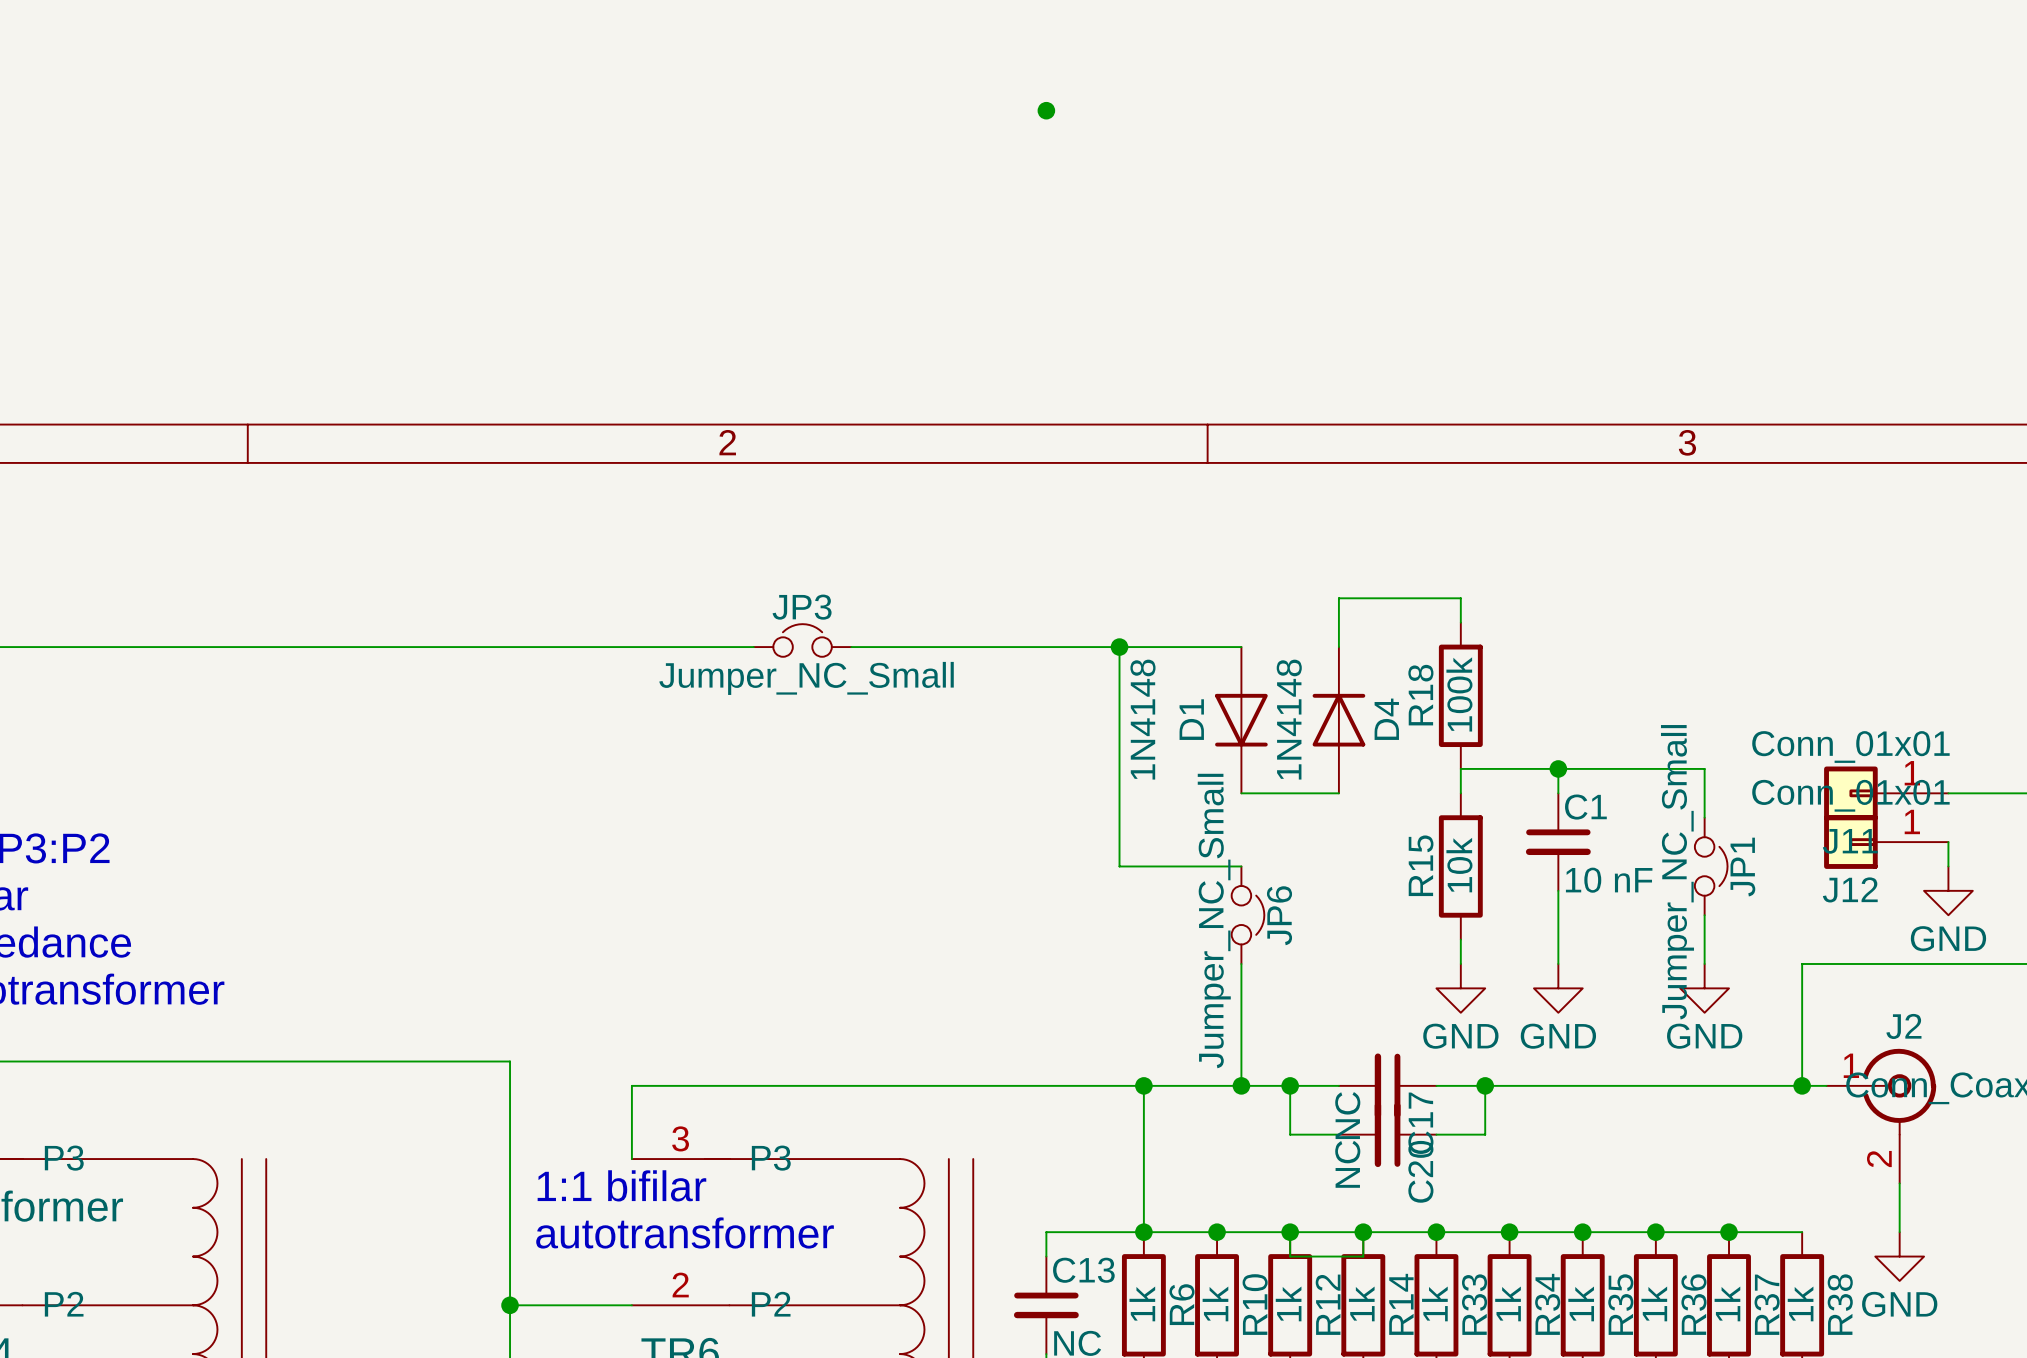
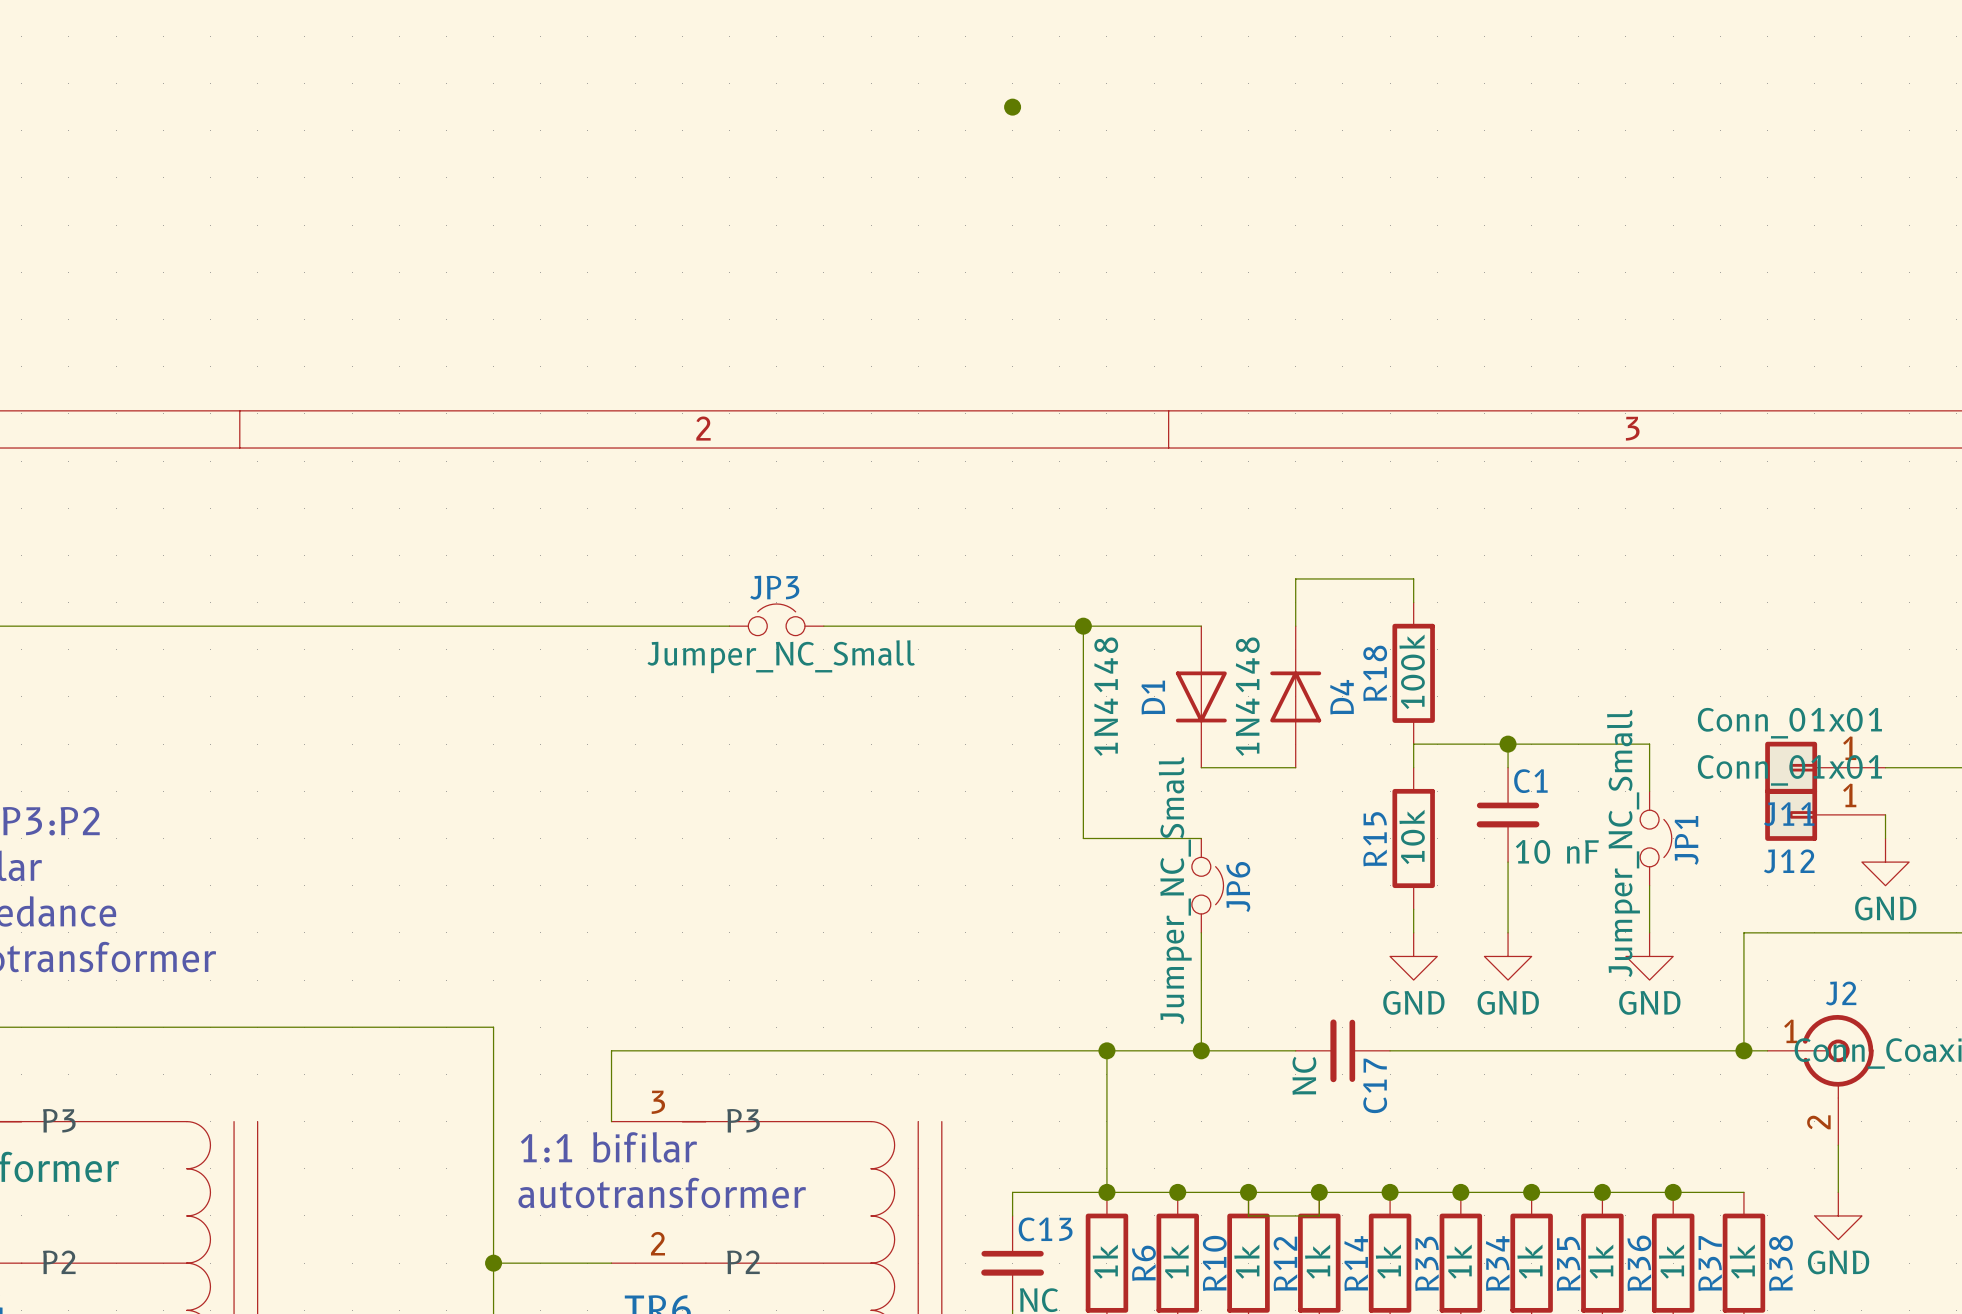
wire: (1290, 1085) (1290, 1134) (1338, 1134) -> none
junction: (1290, 1085) -> none
wire: (1485, 1085) (1485, 1134) (1436, 1134) -> none
junction: (1485, 1085) -> none
C20: NC (1387, 1134) -> none

